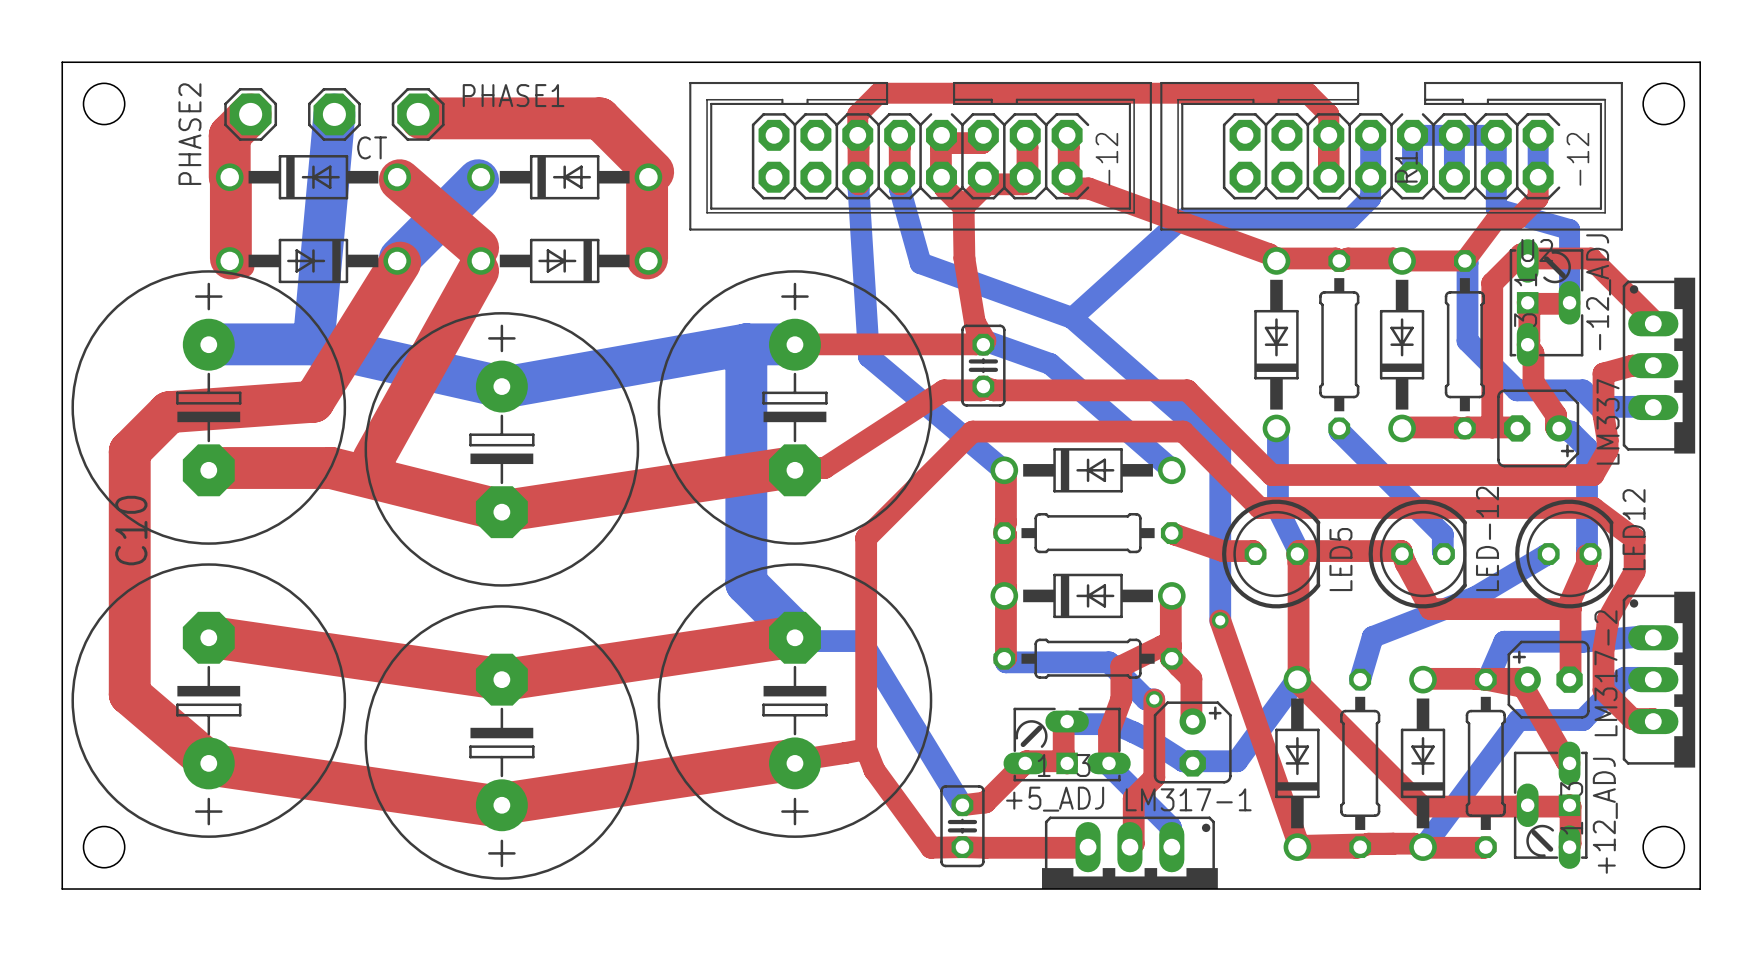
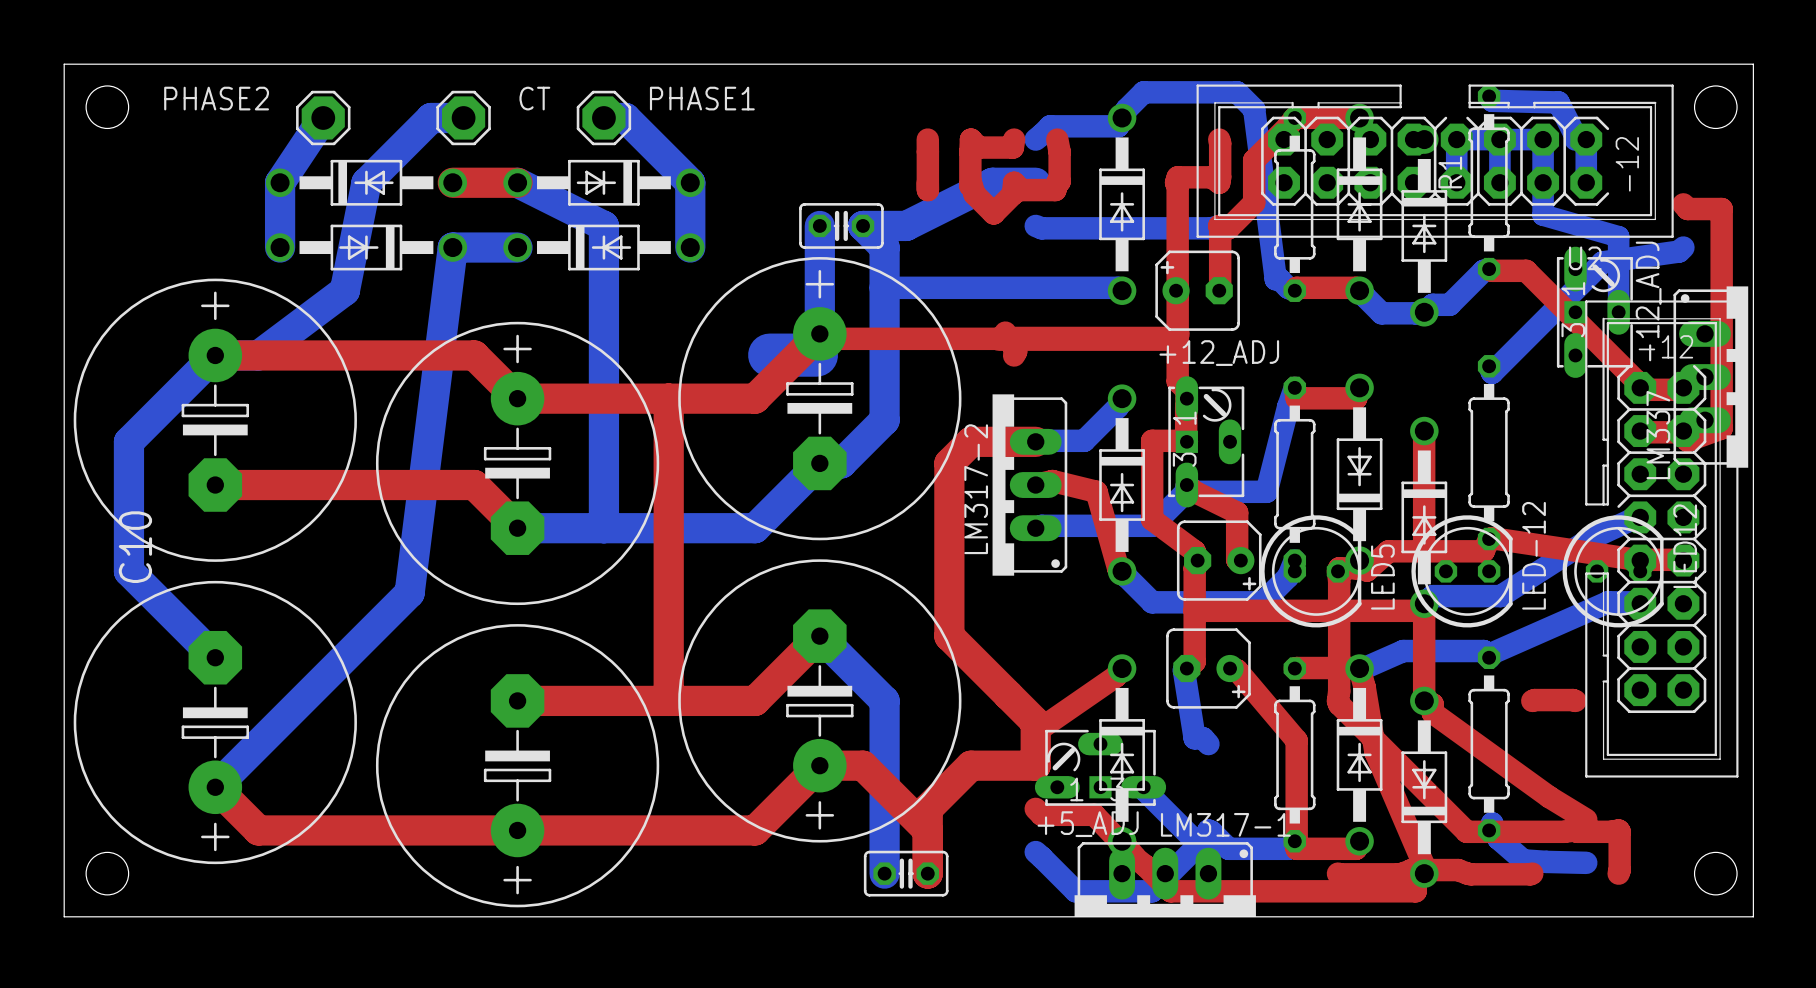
bottom track: none -> (1489, 96) (1492, 100) (1558, 102) (1575, 139)
top track: (250, 114) (229, 135) (229, 260) (243, 266) -> none
PHASE2 position: (250, 114) -> (323, 117)
bottom track: none -> (323, 117) (280, 182) (280, 247)
bottom track: (334, 114) (313, 344) -> none
CT position: (334, 114) -> (463, 117)
top track: (418, 114) (421, 118) (599, 118) (653, 171) (659, 171) (648, 177) (647, 180) (648, 260) -> none
PHASE1 position: (418, 114) -> (603, 117)
bottom track: none -> (463, 117) (431, 117) (366, 182) (344, 290) (258, 355) (215, 355) (128, 441) (128, 571) (215, 657)
bottom track: none -> (603, 117) (625, 117) (690, 182) (690, 247)
top track: none -> (1359, 117) (1294, 117) (1254, 160) (1254, 202) (1228, 228) (1219, 225) (1219, 290)
PHASE2 name rotation: 0° (189, 134) -> 90° clockwise (216, 98)
bottom track: none -> (1035, 139) (1050, 126) (1118, 126) (1126, 109) (1143, 92) (1237, 92) (1254, 109) (1275, 279) (1279, 279) (1288, 287) (1294, 290)
top track: (1067, 135) (1068, 147) (1068, 184) (1067, 177) (1076, 188) (1088, 188) (1269, 254) (1276, 260) (1277, 258) (1335, 258) (1339, 260) (1348, 258) (1464, 260) (1496, 218) (1517, 219) (1538, 198) (1538, 177) -> none
top track: none -> (1219, 139) (1219, 182) (1211, 177) (1177, 177) (1176, 182) (1177, 185) (1177, 287) (1176, 290) (1177, 296) (1177, 381) (1186, 389) (1186, 441) (1152, 440) (1152, 519) (1194, 551) (1197, 560) (1194, 568) (1194, 661) (1186, 668)
bottom track: (1370, 135) (1370, 198) (1349, 219) (1181, 219) (1072, 317) -> none
CT name position: CT (372, 147) -> CT (534, 98)
part: (920, 156) -> none
part: (313, 177) -> none
part: none -> (366, 182)
top track: (397, 177) (478, 248) (480, 260) (478, 270) (372, 459) (331, 468) -> none
top track: none -> (452, 182) (517, 182)
bottom track: (480, 177) (397, 260) -> none
bottom track: none -> (517, 182) (603, 225) (603, 528)
part rotation: 0° (564, 177) -> 180° (603, 182)
top track: (857, 177) (858, 184) (857, 114) (878, 93) (1307, 93) (1328, 114) (1328, 177) -> none
bottom track: (857, 177) (868, 356) (1004, 470) -> none
bottom track: (899, 177) (899, 188) (920, 263) (1072, 317) -> none
bottom track: none -> (1035, 182) (992, 182) (906, 225) (863, 225) (884, 247) (884, 420) (841, 463) (819, 463) (755, 528) (517, 528)
part: none -> (1489, 182)
part: none -> (1122, 204)
part: none -> (1359, 204)
top track: none -> (1683, 204) (1687, 209) (1721, 209) (1721, 428) (1687, 440) (1683, 431) (1640, 431)
top track: (963, 206) (964, 258) (977, 332) (976, 344) (794, 344) -> none
bottom track: none -> (819, 225) (819, 333)
bottom track: none -> (1035, 225) (1041, 228) (1211, 228) (1219, 225)
part: none -> (1424, 225)
part: none -> (366, 247)
bottom track: none -> (517, 247) (452, 247) (409, 592) (215, 787)
bottom track: none -> (1683, 247) (1679, 251) (1602, 262) (1492, 372) (1489, 366)
part: (313, 260) -> none
top track: (397, 260) (395, 262) (400, 262) (313, 401) (169, 412) (129, 451) (129, 694) (210, 764) (499, 806) (511, 802) (787, 760) (794, 763) (795, 760) (866, 749) -> none
part rotation: 0° (564, 260) -> 180° (603, 247)
top track: none -> (1489, 269) (1492, 270) (1526, 270) (1636, 381) (1640, 387) (1645, 389) (1679, 389) (1683, 387)
bottom track: none -> (1489, 269) (1483, 270) (1449, 304) (1432, 304) (1424, 312) (1381, 313) (1359, 290)
bottom track: (1464, 260) (1467, 262) (1467, 340) (1516, 390) (1582, 390) (1599, 406) (1653, 407) -> none
bottom track: none -> (884, 287) (1118, 287) (1122, 290)
part: none -> (1197, 290)
top track: none -> (1294, 290) (1296, 287) (1356, 287) (1359, 290)
top track: (1569, 302) (1527, 302) (1529, 312) (1527, 344) (1533, 353) (1533, 382) (1555, 415) (1555, 427) (1559, 428) -> none
bottom track: (1072, 317) (1220, 447) (1220, 620) -> none
top track: none -> (1177, 333) (1172, 338) (829, 338) (819, 333) (755, 398) (517, 398) (474, 355) (215, 355)
top track: (1653, 323) (1652, 320) (1591, 258) (1529, 258) (1527, 260) (1521, 254) (1492, 283) (1492, 427) -> none
bottom track: (206, 344) (313, 344) -> none
bottom track: (313, 344) (501, 386) (746, 344) (746, 583) (791, 628) (795, 641) (861, 641) (962, 805) -> none
bottom track: (983, 344) (985, 340) (1050, 363) (1171, 470) -> none
part: (1276, 344) -> none
part: (1339, 344) -> none
part: (1402, 344) -> none
R1 position: (1464, 344) -> (1294, 204)
part rotation: 0° (983, 365) -> 90° clockwise (841, 225)
part position: (983, 365) -> (841, 225)
top track: (1653, 365) (1632, 365) (1603, 373) (1603, 415) (1607, 450) (1593, 475) (1271, 475) (1187, 390) (993, 390) (983, 386) (981, 390) (944, 390) (824, 468) (795, 468) (794, 470) (787, 468) (501, 512) (499, 509) (331, 468) -> none
top track: none -> (1294, 387) (1296, 398) (1356, 398) (1359, 387)
bottom track: none -> (1294, 387) (1266, 491) (1194, 491) (1186, 485) (1186, 491) (1152, 525) (1041, 525) (1035, 528)
top track: none -> (668, 398) (668, 700)
bottom track: none -> (1122, 398) (1118, 406) (1084, 440) (1035, 441)
part position: (794, 407) -> (819, 398)
top track: none -> (1424, 431) (1424, 551)
top track: none -> (1035, 441) (970, 441) (949, 463) (949, 636) (1035, 722) (1035, 765) (970, 765) (927, 808) (927, 873)
bottom track: (1276, 428) (1277, 509) (1298, 551) (1297, 554) -> none
bottom track: (1339, 428) (1339, 431) (1442, 534) (1443, 554) -> none
top track: (1402, 428) (1517, 428) -> none
part: (1538, 428) -> none
bottom track: (1559, 428) (1570, 431) (1587, 448) (1587, 551) (1590, 554) -> none
part: none -> (1489, 452)
part: none -> (1294, 474)
part: none -> (1359, 474)
top track: (331, 468) (210, 468) (208, 470) -> (517, 528) (474, 485) (215, 485)
top track: (1004, 470) (1005, 472) (1004, 533) (1005, 534) (1004, 595) (1005, 596) (1005, 658) (1004, 658) -> (1035, 485) (1052, 481) (1096, 491) (1118, 568) (1122, 571)
part rotation: 0° (1088, 470) -> 90° clockwise (1122, 485)
top track: none -> (1186, 485) (1194, 491) (1237, 512) (1237, 559) (1240, 560)
part: none -> (1424, 517)
bottom track: none -> (1640, 517) (1590, 538) (1500, 596) (1432, 596) (1424, 603)
part: none -> (1661, 538)
part: (1088, 533) -> none
top track: (1171, 533) (1222, 551) (1253, 551) (1255, 554) -> none
part: none -> (1219, 560)
bottom track: none -> (1294, 560) (1288, 576) (1262, 602) (1152, 602) (1122, 571)
top track: (1315, 551) (1401, 551) (1405, 563) (1430, 609) (1570, 609) -> (1356, 568) (1359, 560) (1366, 570) (1388, 551) (1483, 551) (1489, 538) (1492, 538) (1640, 560) (1683, 560)
bottom track: (1548, 554) (1475, 597) (1372, 636) (1360, 679) -> none
top track: (1590, 554) (1587, 555) (1587, 563) (1570, 600) (1569, 679) -> none
bottom track: none -> (1640, 603) (1607, 602) (1492, 653) (1489, 657) (1483, 651) (1403, 651) (1359, 668)
top track: none -> (1194, 610) (1424, 610) (1424, 700) (1432, 704) (1432, 712) (1549, 797) (1586, 819)
part: (1088, 595) -> none
top track: (1171, 595) (1170, 658) (1191, 678) (1192, 721) -> none
top track: none -> (819, 636) (755, 700) (517, 700)
bottom track: none -> (819, 636) (884, 700) (884, 873)
top track: (1220, 620) (1299, 845) (1393, 843) -> none
via: (1220, 620) -> none
top track: (208, 637) (501, 679) (794, 637) -> none
bottom track: (1653, 637) (1640, 636) (1582, 641) (1504, 641) (1488, 678) (1485, 679) -> none
top track: (1170, 645) (1162, 645) (1121, 666) (1121, 699) (1108, 732) (1108, 763) -> none
top track: none -> (1122, 668) (1115, 676) (1037, 730) (1008, 695)
bottom track: none -> (1186, 668) (1183, 670) (1194, 738) (1203, 738) (1208, 744)
top track: none -> (1230, 668) (1237, 670) (1296, 740) (1296, 848)
top track: none -> (1294, 668) (1359, 668) (1364, 687) (1375, 752) (1424, 865) (1424, 873) (1415, 874) (1415, 891) (1170, 891) (1134, 857) (1122, 841) (1126, 848) (1094, 814) (1041, 814) (1035, 808)
bottom track: (1004, 658) (1005, 662) (1108, 662) (1146, 699) (1154, 699) -> none
part: (1088, 658) -> none
bottom track: (1297, 679) (1237, 761) (1195, 761) (1192, 763) (1183, 761) (1154, 742) (1115, 724) (1067, 724) (1067, 721) -> none
top track: (1423, 679) (1475, 678) (1523, 687) (1566, 761) (1569, 763) -> none
part: (1548, 679) -> none
bottom track: (1653, 679) (1652, 677) (1624, 677) (1582, 720) (1518, 720) (1423, 847) -> none
LM317-2 rotation: 0° (1658, 679) -> 180° (1029, 485)
LM317-2 position: (1658, 679) -> (1029, 485)
top track: (1154, 699) (1154, 777) (1133, 798) (1133, 843) (1129, 847) -> none
via: (1154, 699) -> none
part position: (794, 700) -> (819, 700)
top track: (1067, 721) (1063, 724) (1063, 753) (1067, 763) (1063, 761) (1026, 761) (985, 802) (962, 805) -> none
part: none -> (1489, 744)
top track: (1653, 721) (1652, 719) (1632, 719) (1603, 690) (1603, 649) (1607, 619) (1634, 571) (1634, 538) (1593, 507) (1259, 507) (1183, 431) (972, 431) (866, 538) (866, 749) -> none
part: none -> (1122, 754)
part: none -> (1294, 754)
+12_ADJ footprint: [1513, 741, 1588, 869] -> [1168, 376, 1245, 508]
part rotation: 0° (1192, 742) -> 90° clockwise (1208, 668)
part position: (1192, 742) -> (1208, 668)
top track: (866, 749) (874, 770) (931, 847) (1088, 847) -> none
top track: none -> (215, 787) (258, 830) (755, 830) (819, 765) (863, 765) (927, 830)
part rotation: 0° (1297, 763) -> 180° (1359, 754)
part: (1360, 763) -> none
part: none -> (1424, 787)
part: (1423, 763) -> none
part: (1485, 763) -> none
bottom track: none -> (1489, 830) (1492, 823) (1498, 838) (1523, 860) (1586, 862)
bottom track: none -> (1294, 841) (1288, 848) (1228, 848) (1208, 830) (1203, 840) (1152, 891) (1075, 891) (1035, 852)
top track: none -> (1359, 841) (1356, 848) (1296, 848)
+12_ADJ name position: +12_ADJ (1605, 815) -> +12_ADJ (1219, 353)
part rotation: 0° (962, 826) -> 90° clockwise (906, 873)
part position: (962, 826) -> (906, 873)

